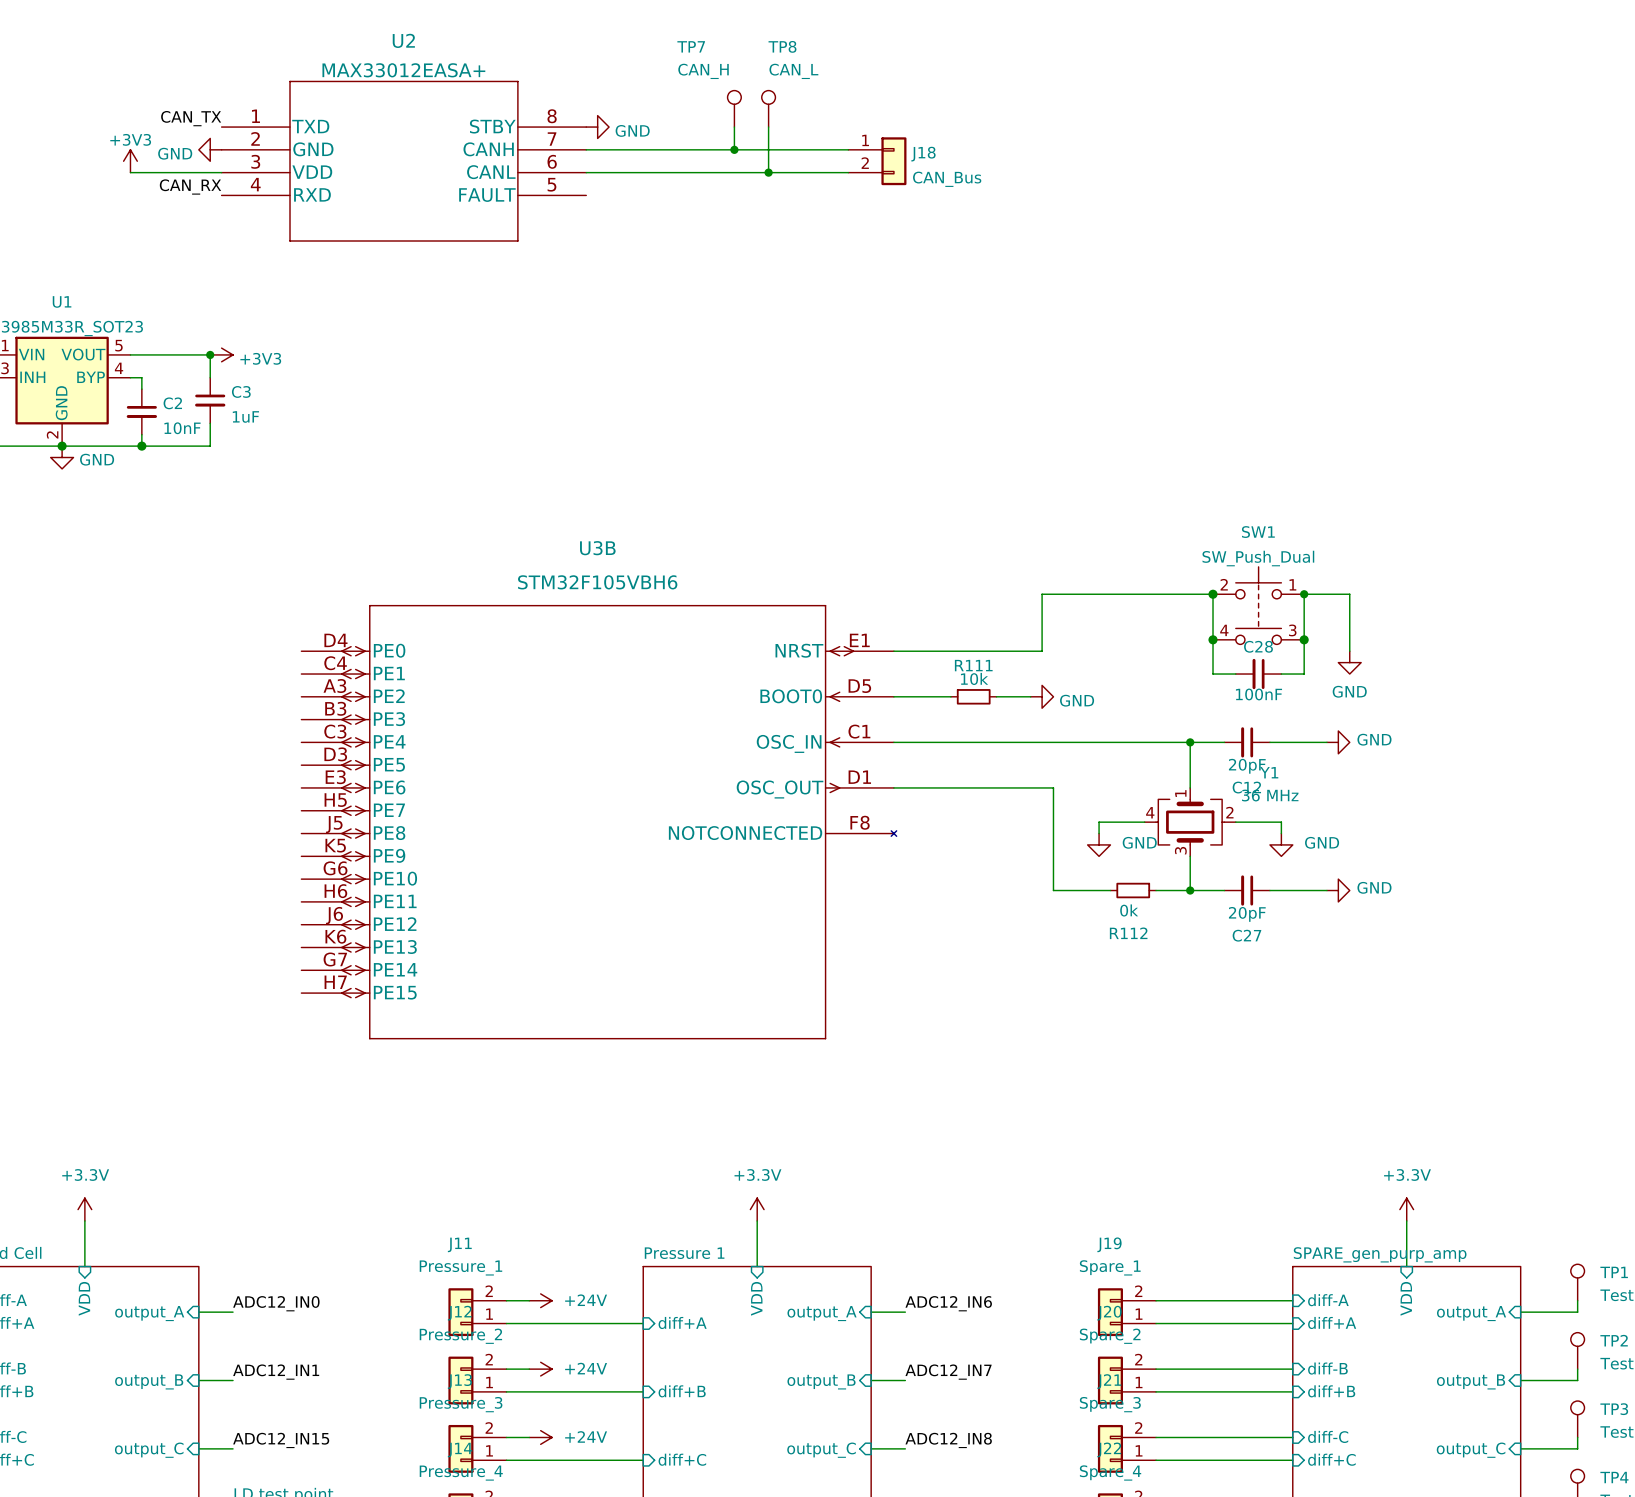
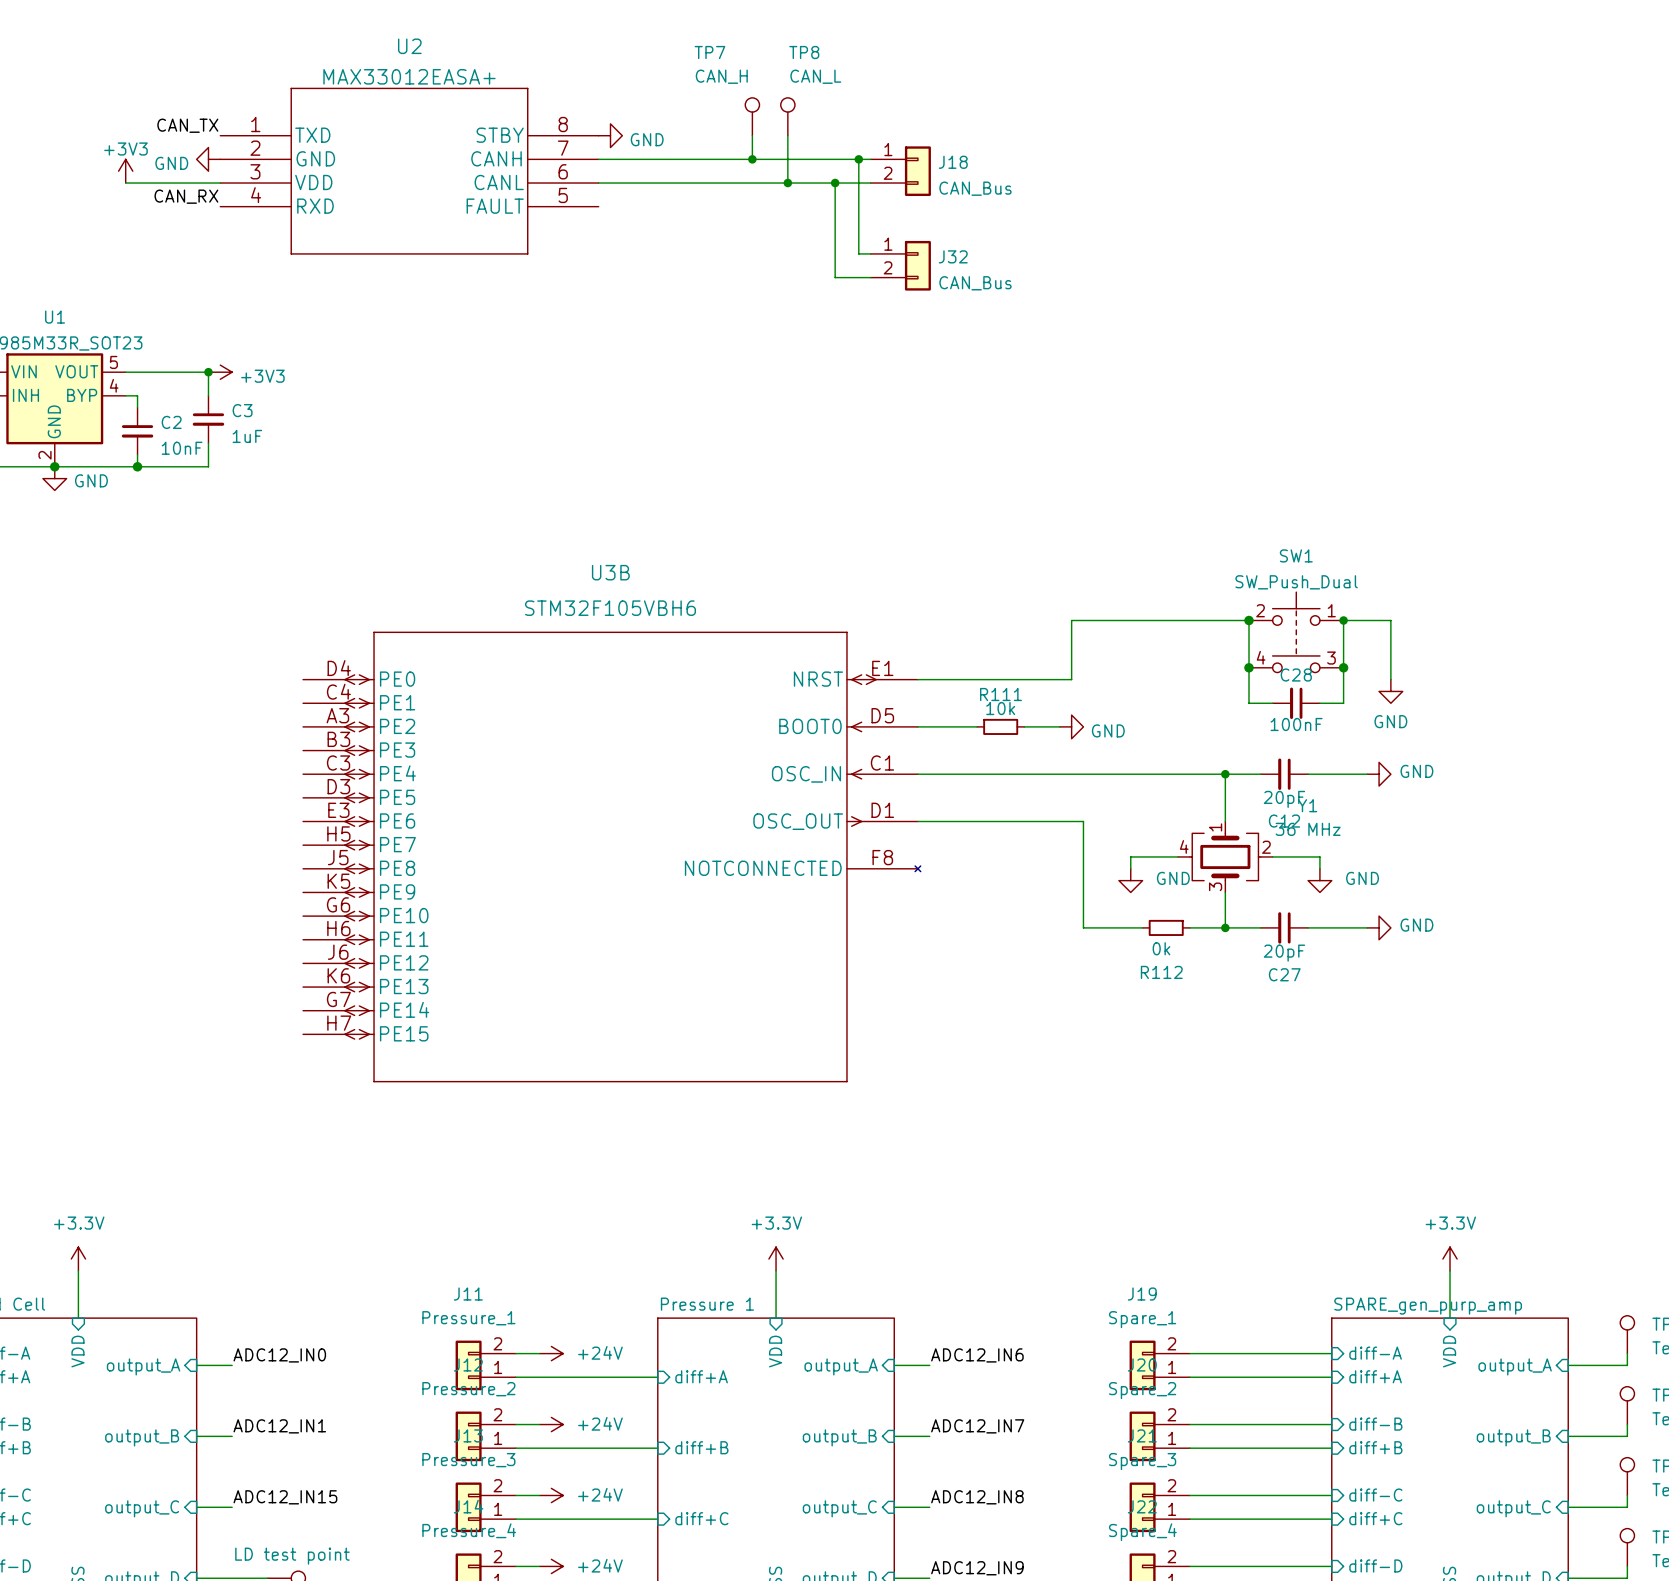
wire: none -> (858, 159) (858, 253) (870, 253)
junction: none -> (858, 159)
wire: none -> (835, 183) (835, 277) (870, 277)
junction: none -> (835, 183)
J32: none -> CAN_Bus (900, 265)

